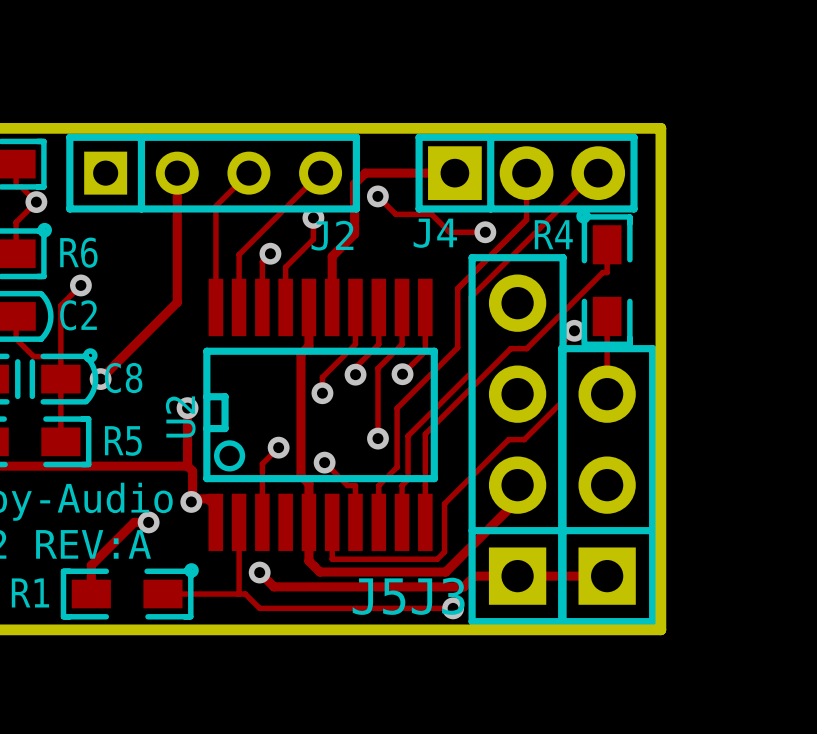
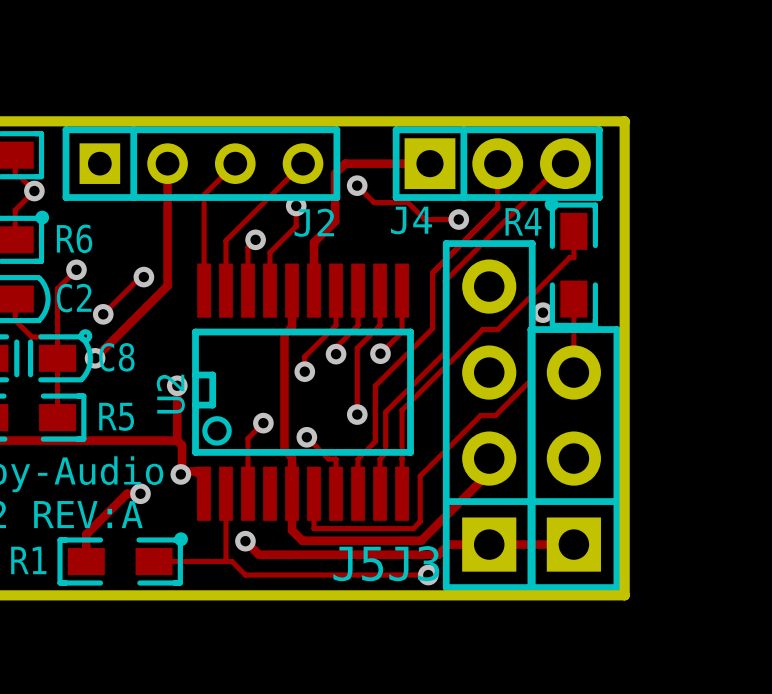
track: none -> (143, 277) (140, 277) (103, 314)
via: none -> (143, 277)
via: none -> (103, 314)

